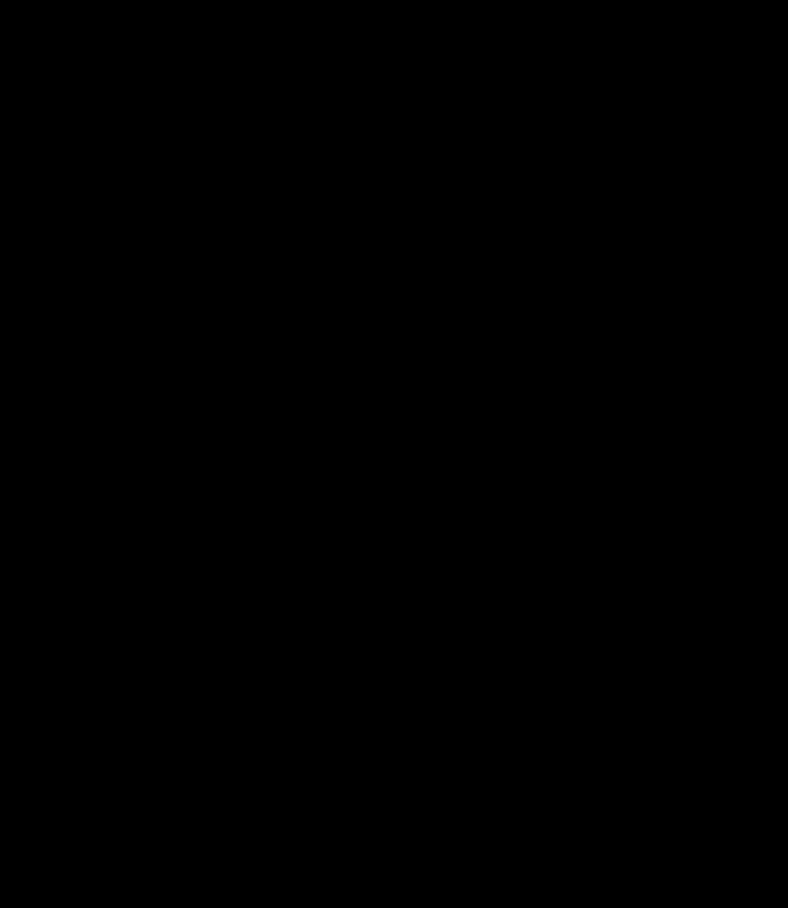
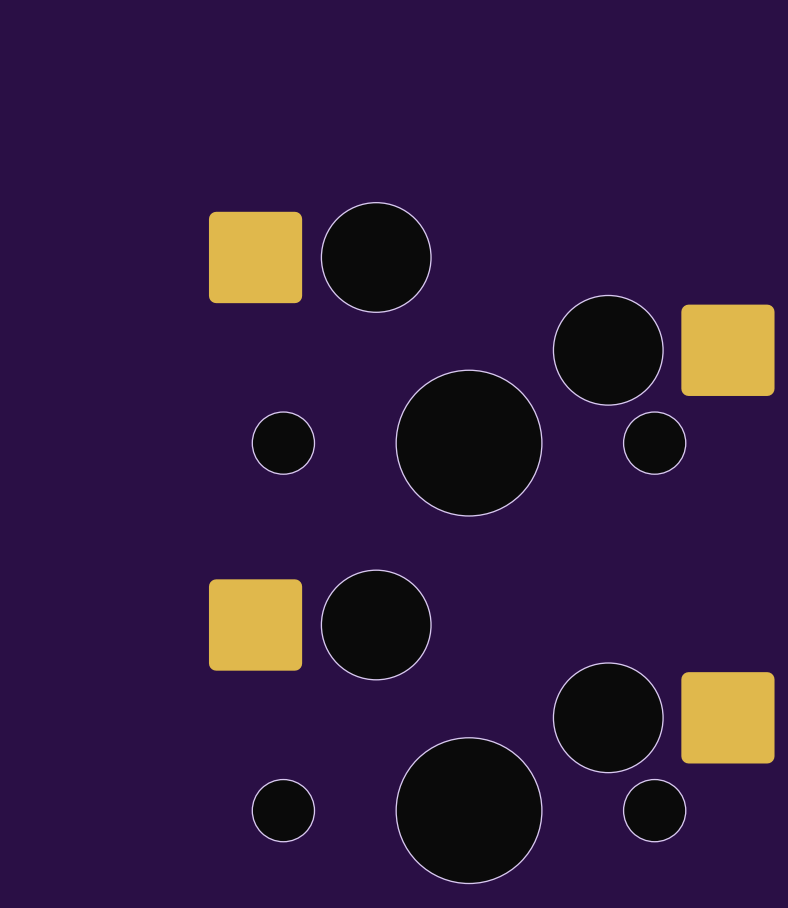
part: none -> (491, 359)
part: none -> (491, 726)

